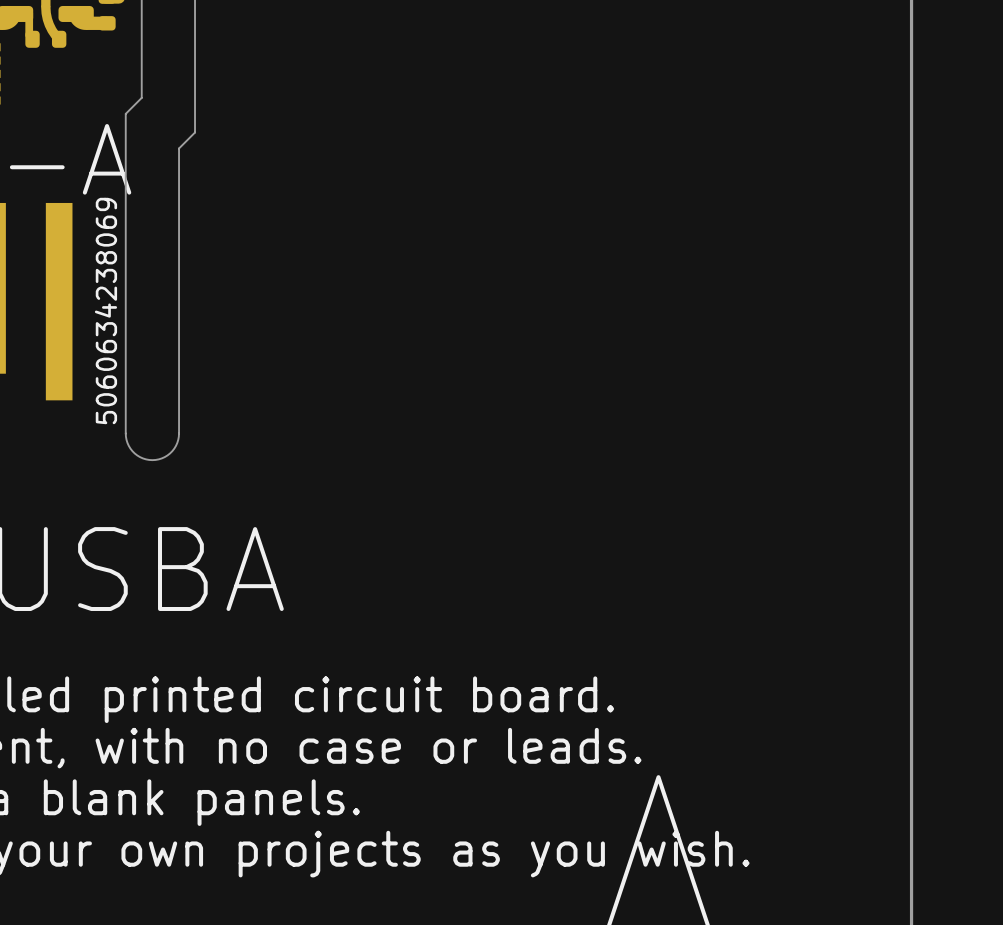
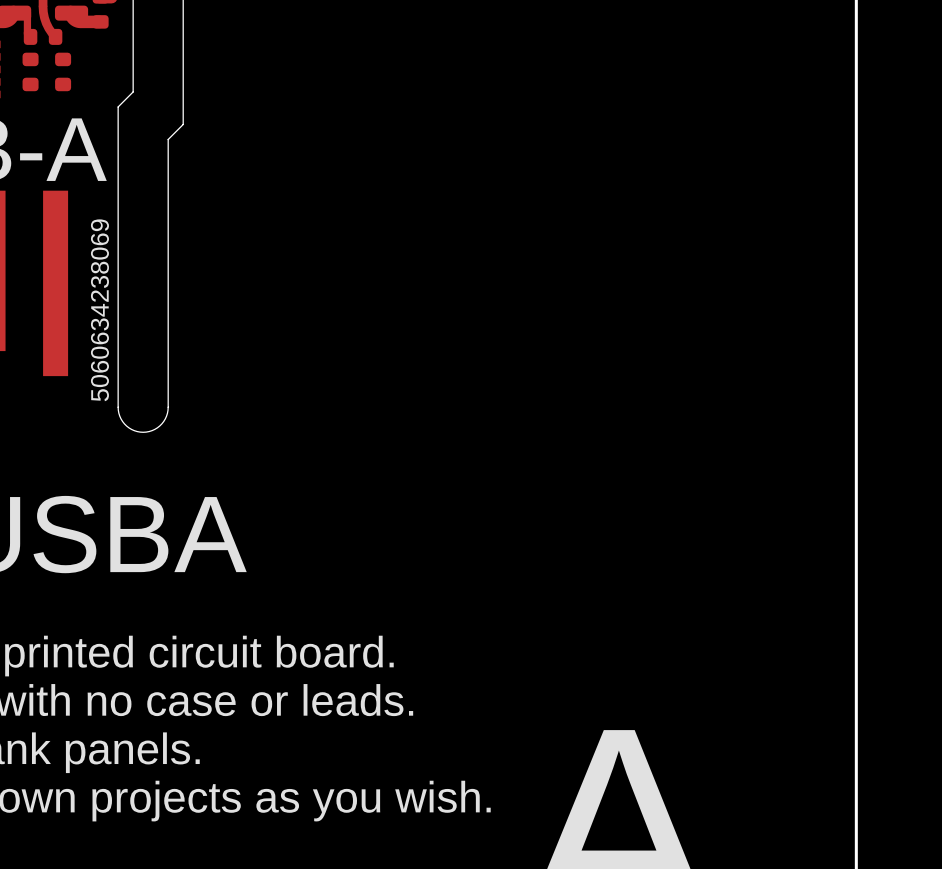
part: none -> (30, 71)
part: none -> (63, 71)

